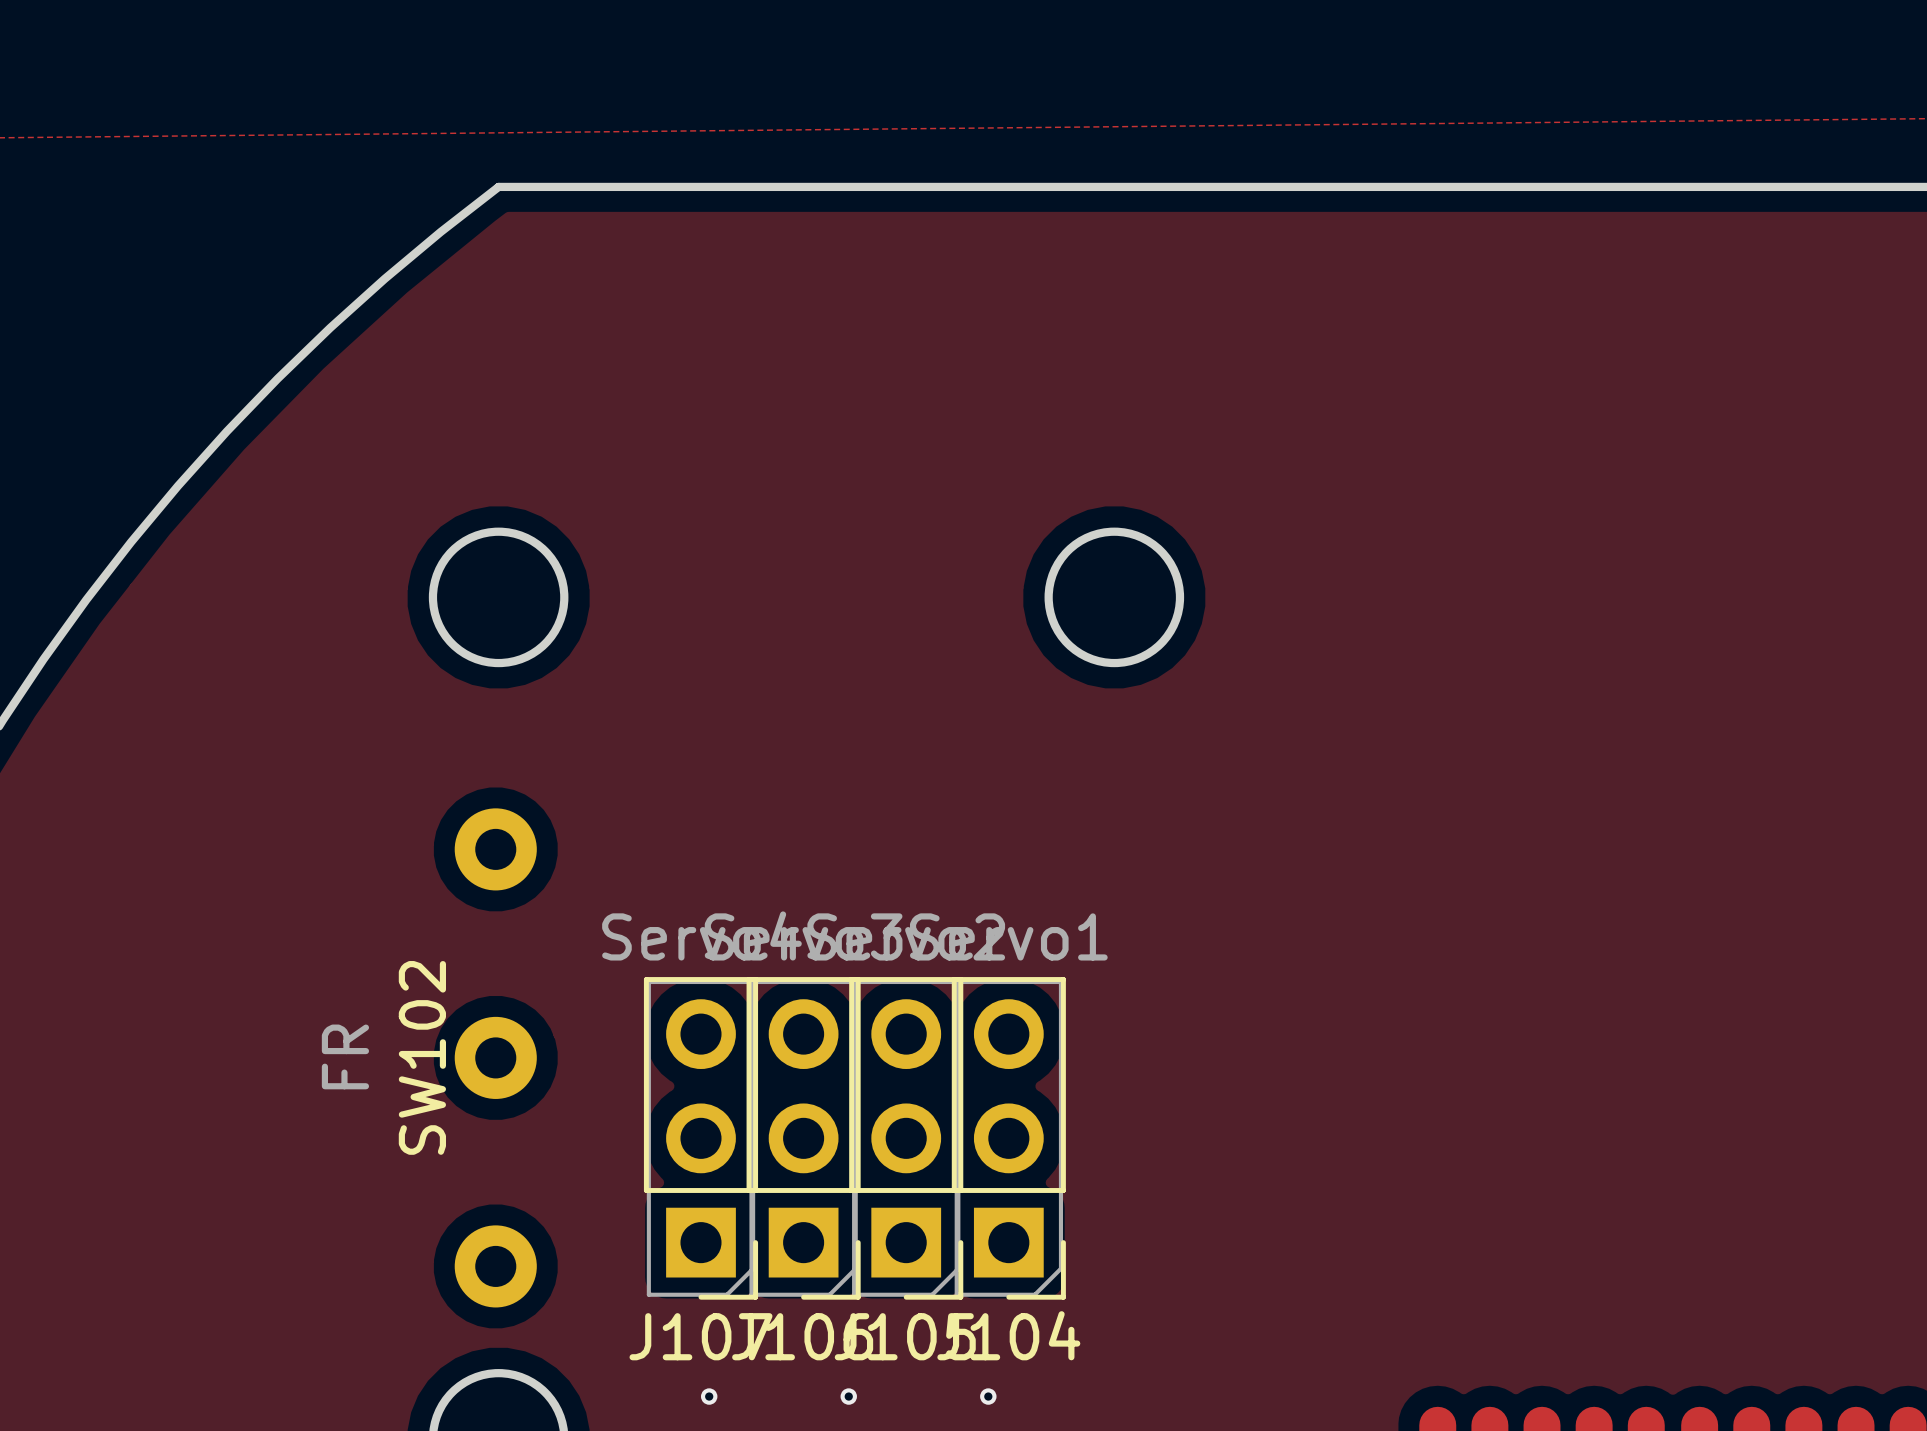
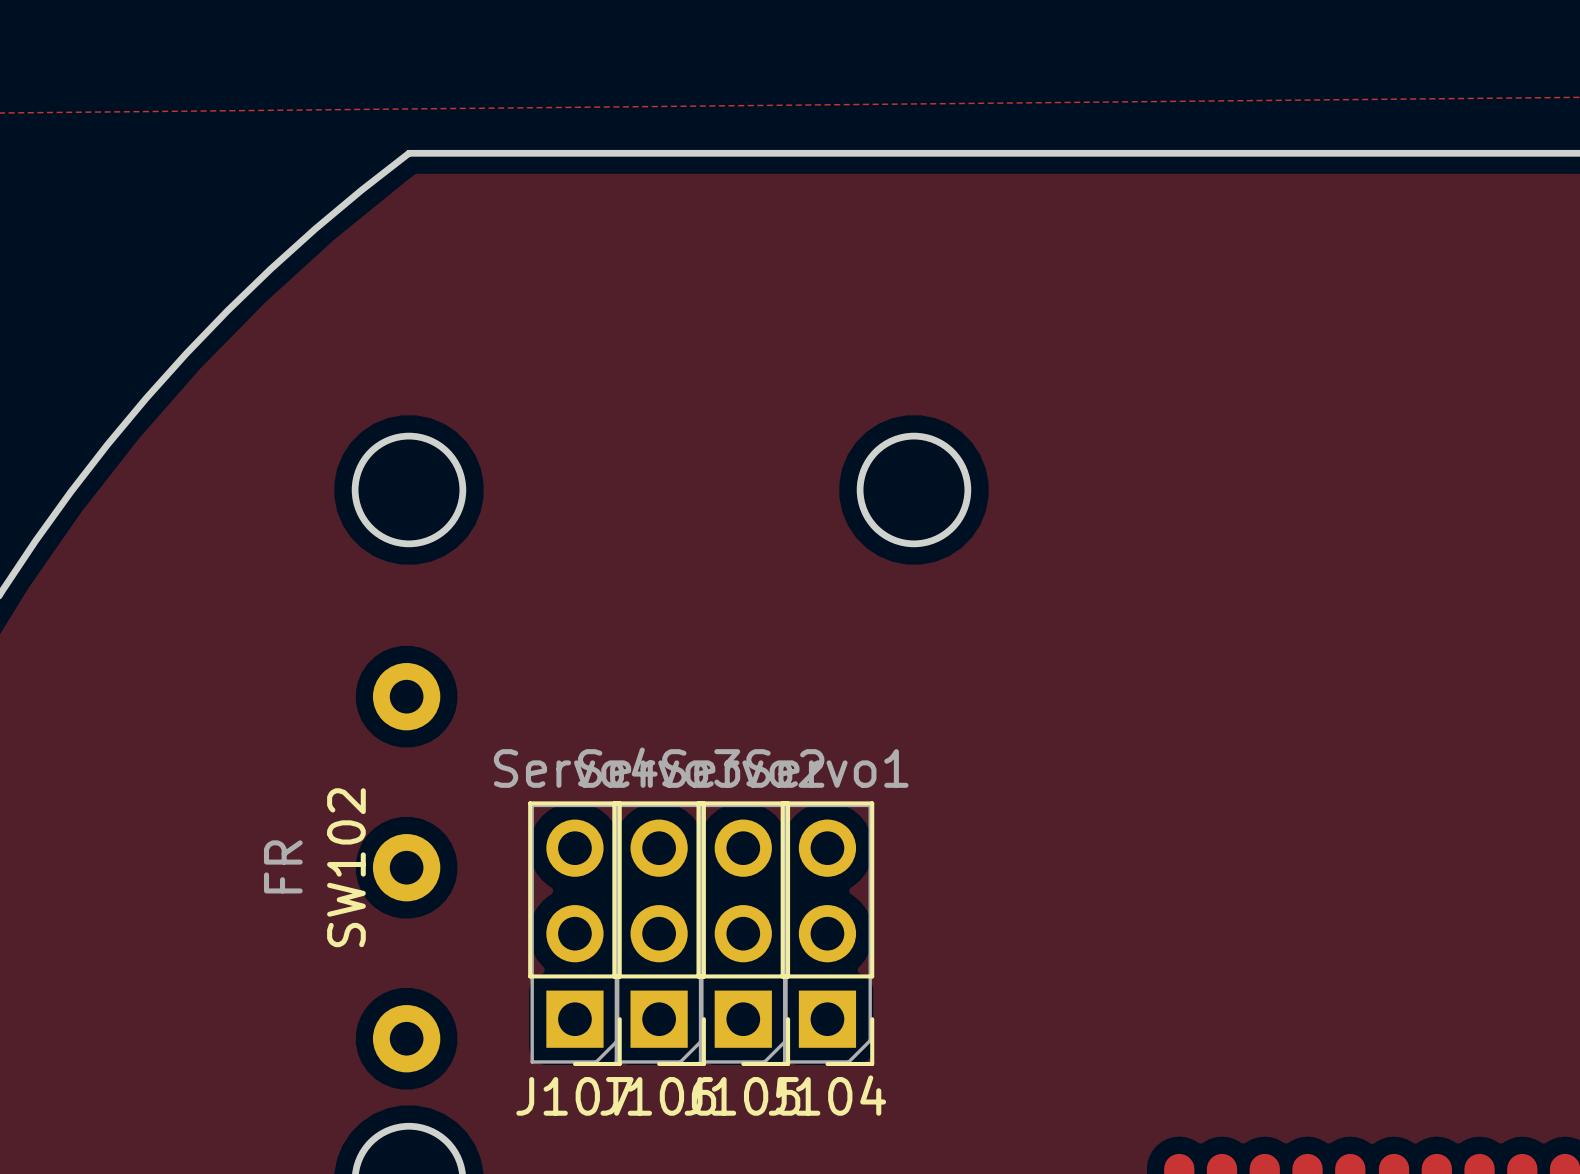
via: (709, 1396) -> none
via: (848, 1396) -> none
via: (988, 1396) -> none

